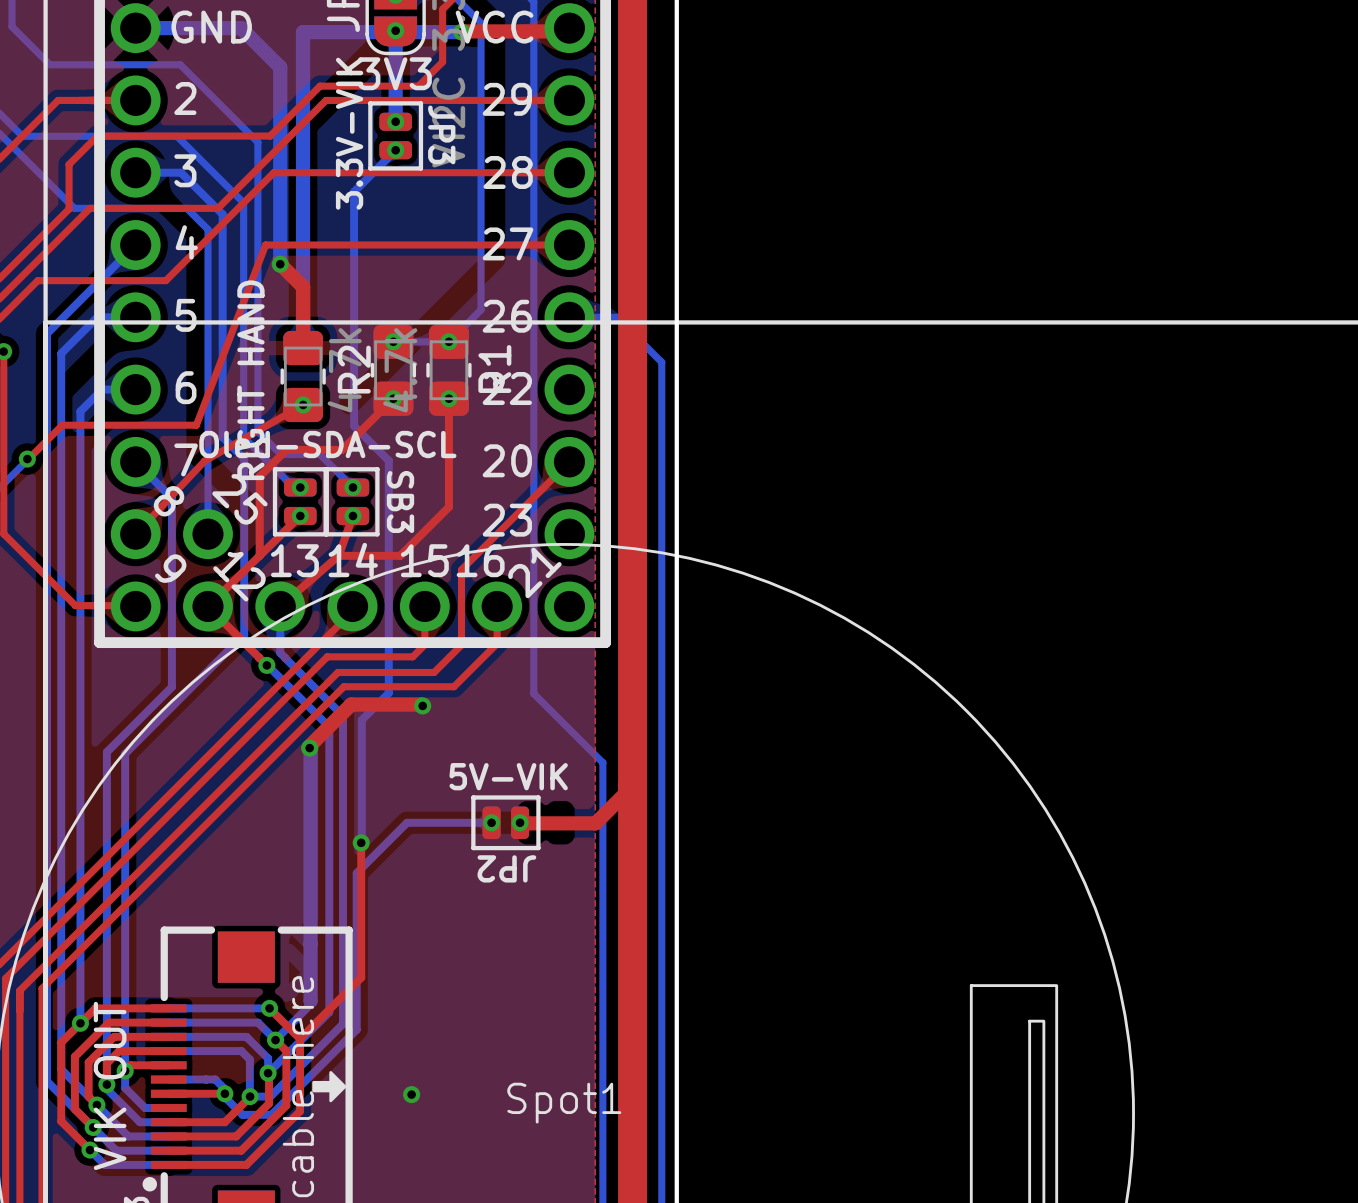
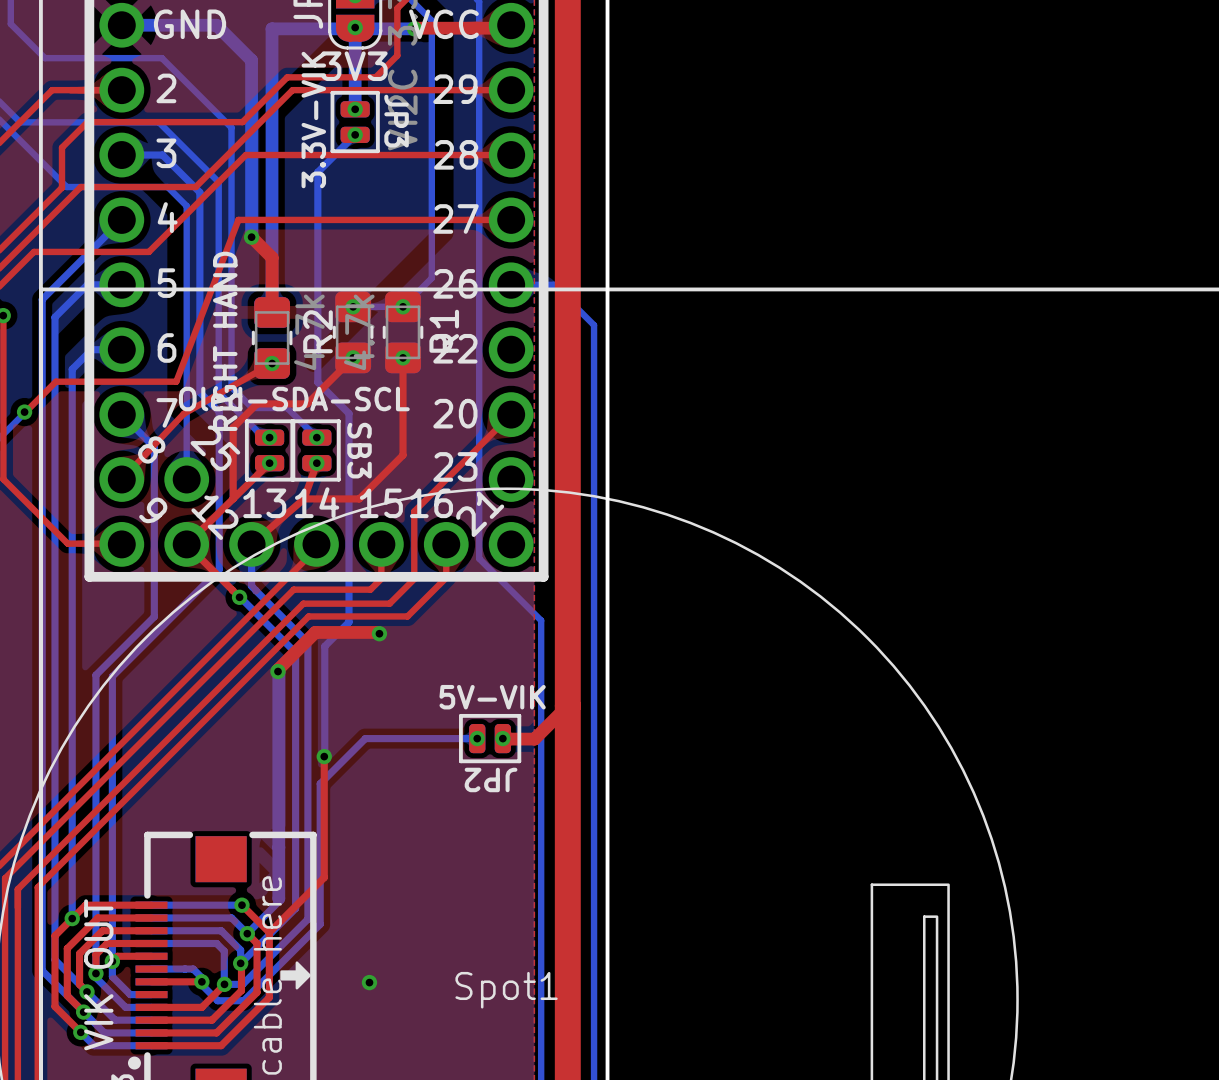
bottom track: (533, 622) (533, 693) (602, 762) -> (479, 558) (541, 620) (541, 684)
bottom track: none -> (441, 738) (477, 738)
JP2 position: (505, 822) -> (490, 738)
top track: (520, 822) (560, 823) -> none

